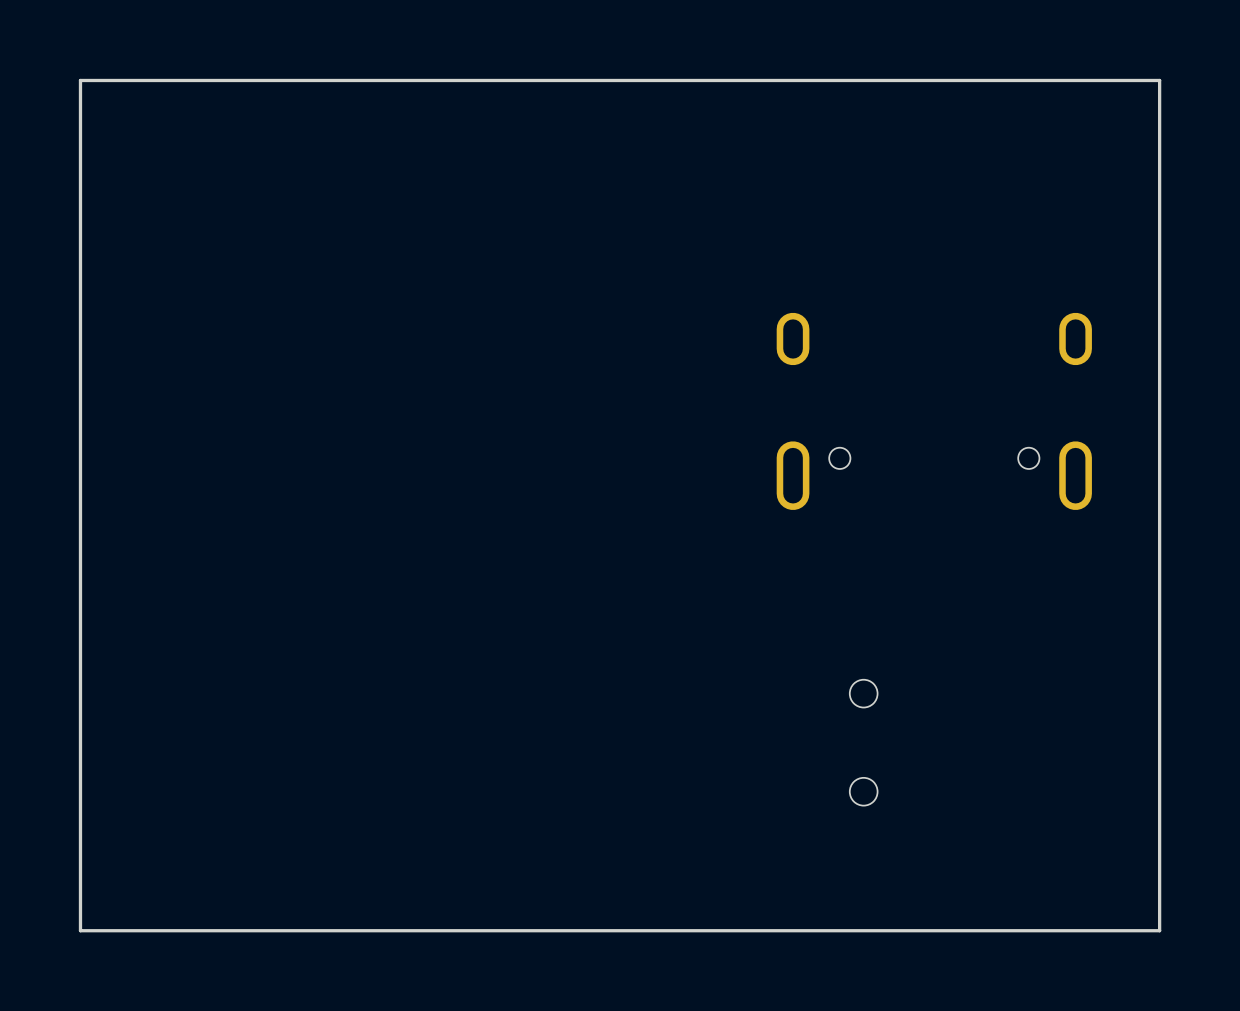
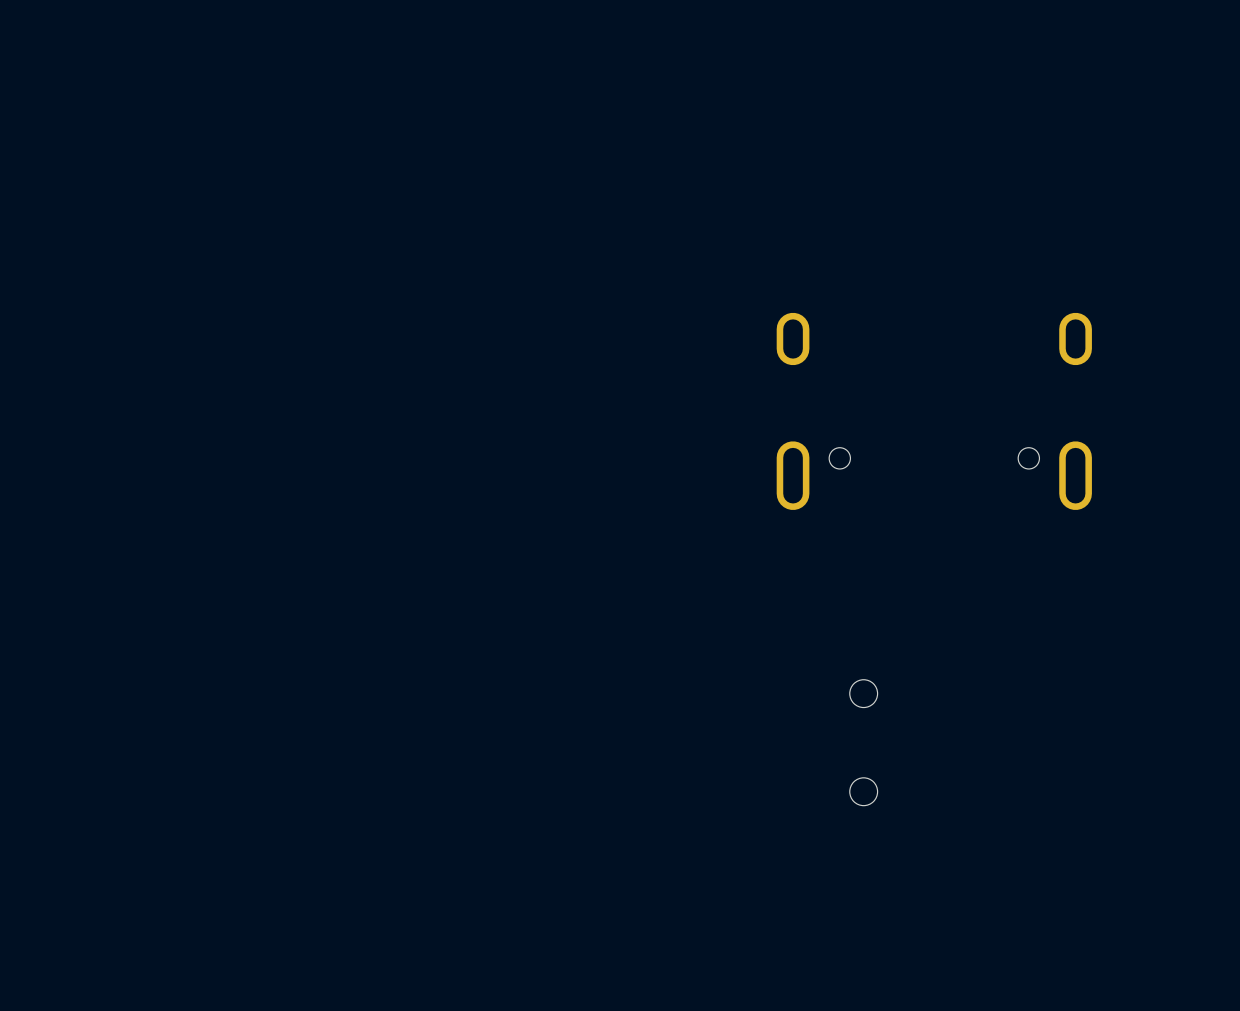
board edge: (1159, 80) (80, 80) (80, 930) (1159, 930) (1159, 80) -> none

